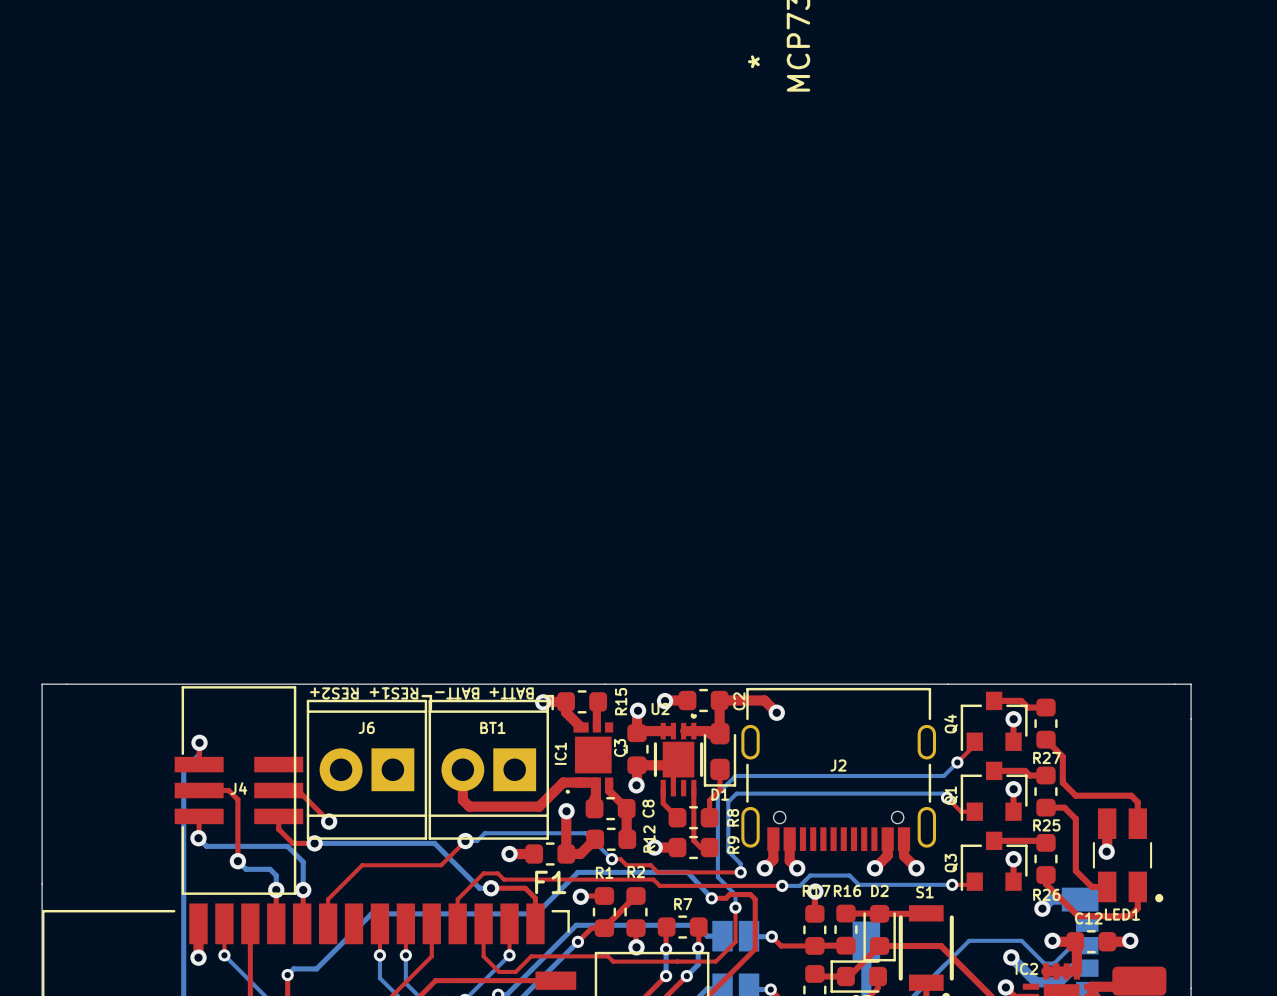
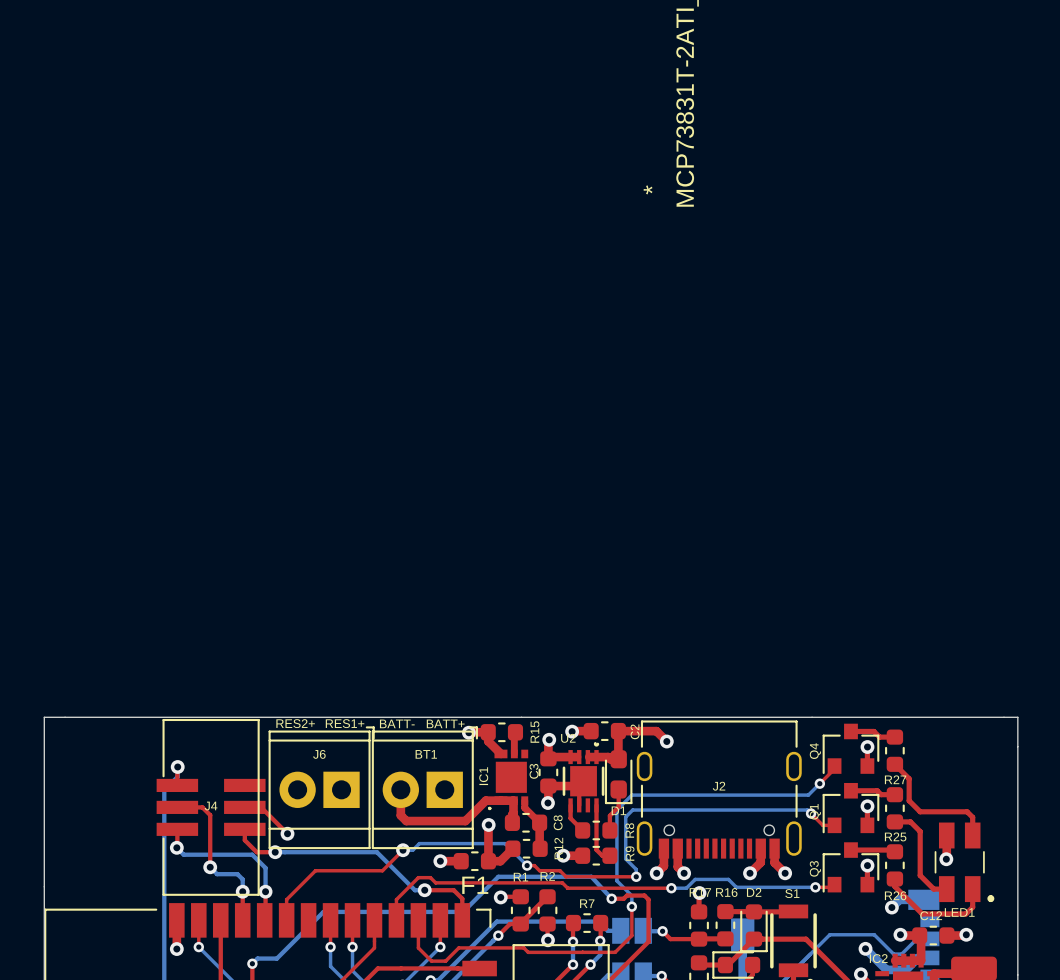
text rotation: 0° (334, 693) -> 180° (295, 723)
text rotation: 0° (393, 693) -> 180° (345, 723)
text rotation: 0° (457, 693) -> 180° (397, 723)
text rotation: 0° (511, 693) -> 180° (445, 723)

